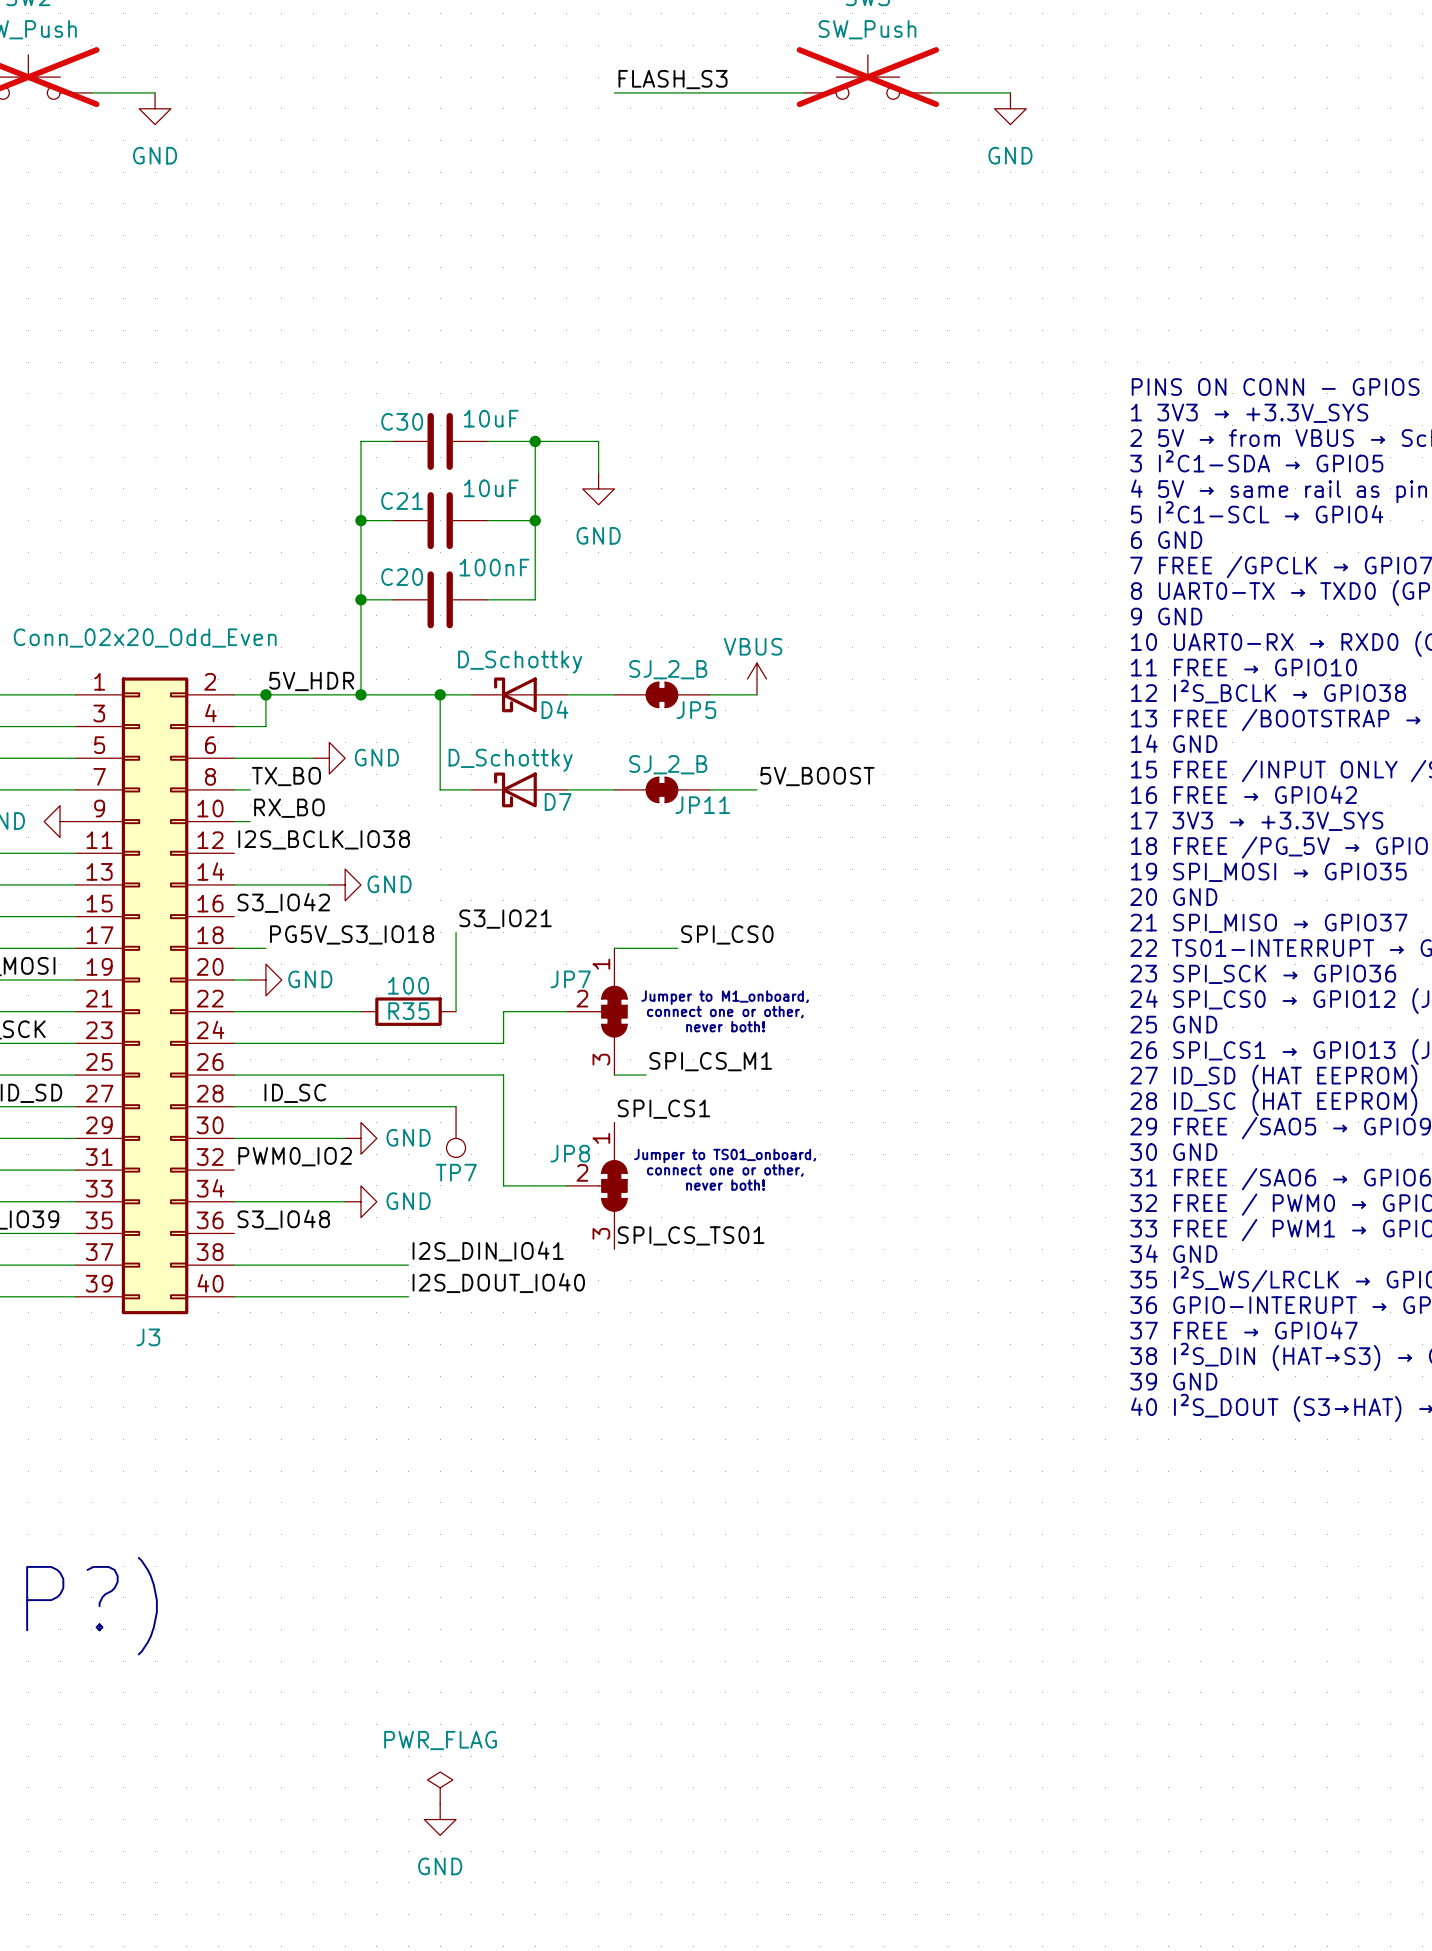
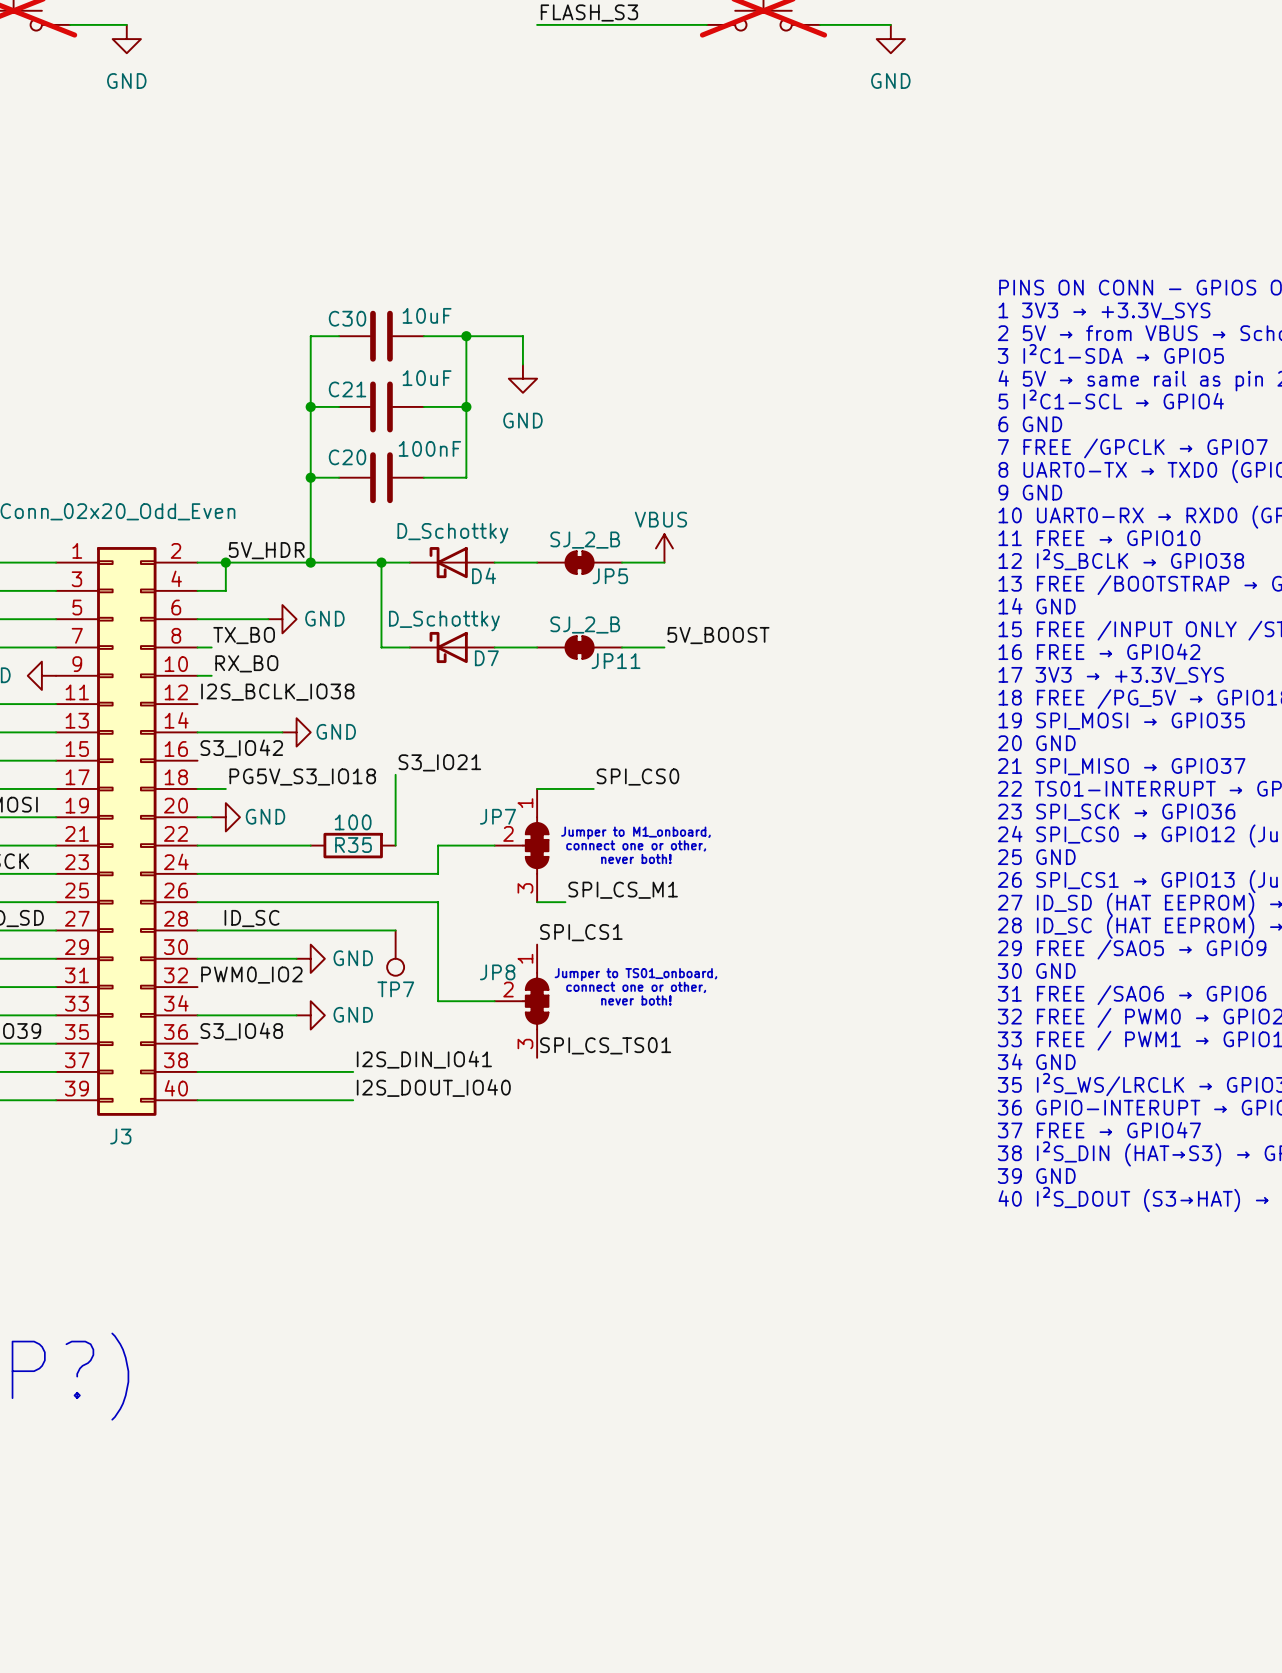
power symbol: PWR_FLAG (440, 1787) -> none
power symbol: GND (440, 1819) -> none

